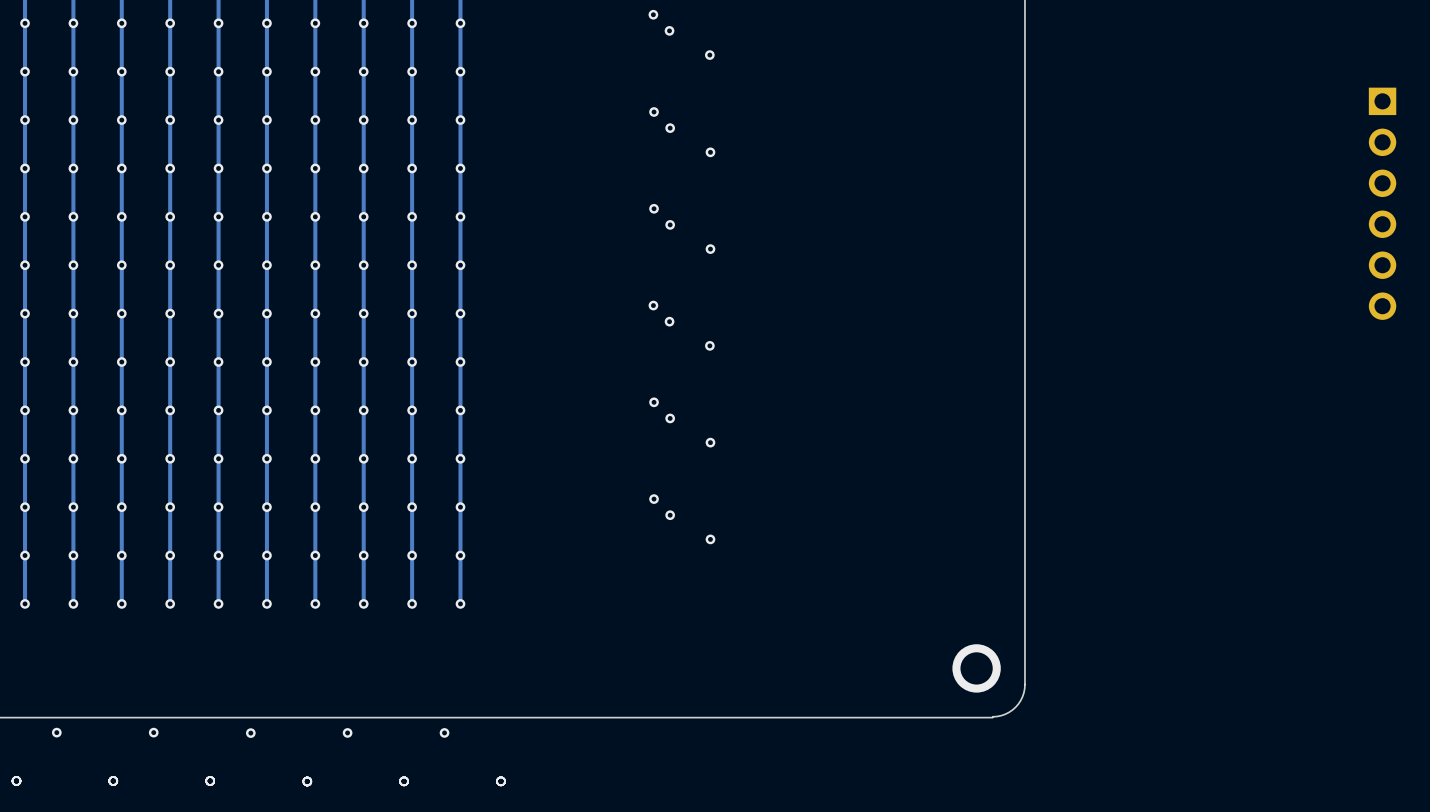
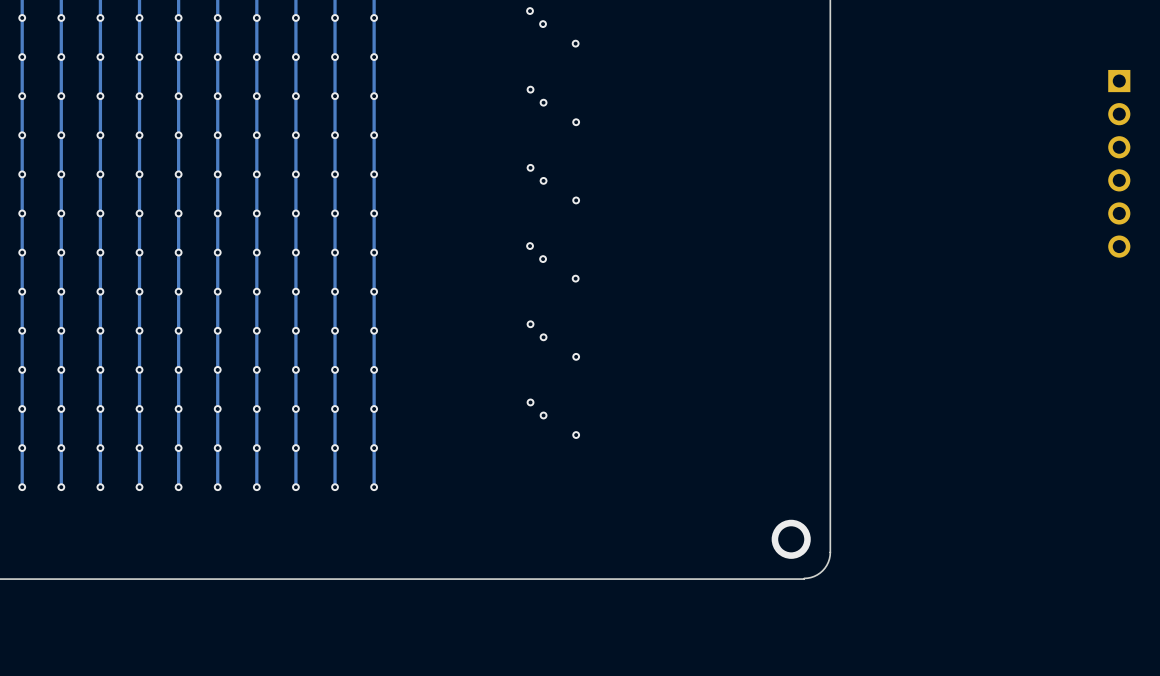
via: (56, 732) -> none
via: (153, 732) -> none
via: (347, 732) -> none
via: (444, 732) -> none
via: (250, 733) -> none
via: (16, 781) -> none
via: (113, 781) -> none
via: (210, 781) -> none
via: (307, 781) -> none
via: (404, 781) -> none
via: (500, 781) -> none

